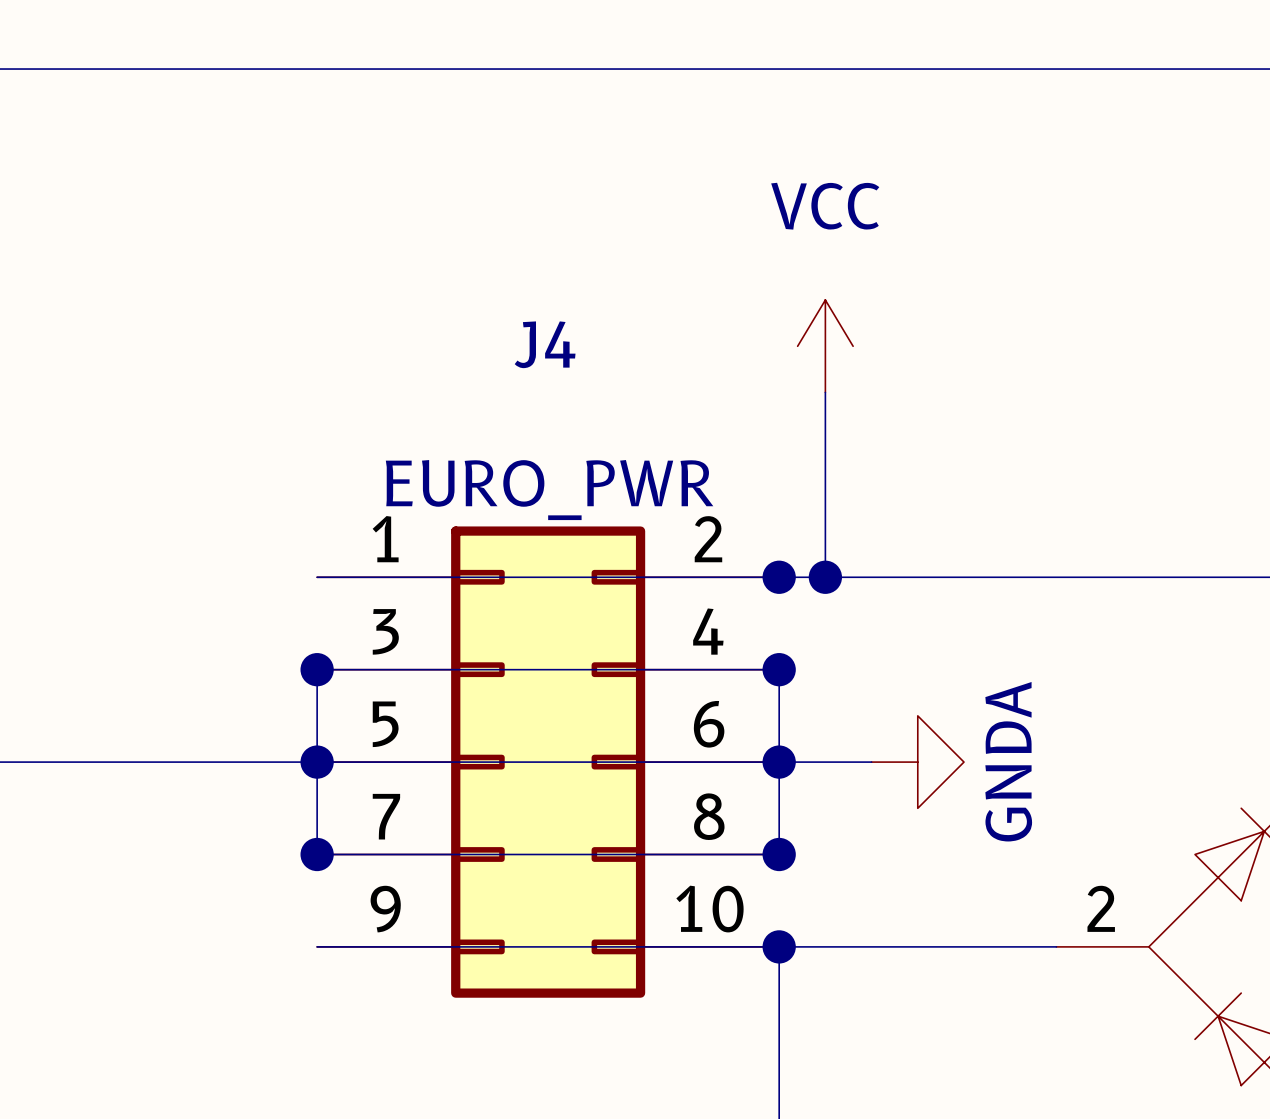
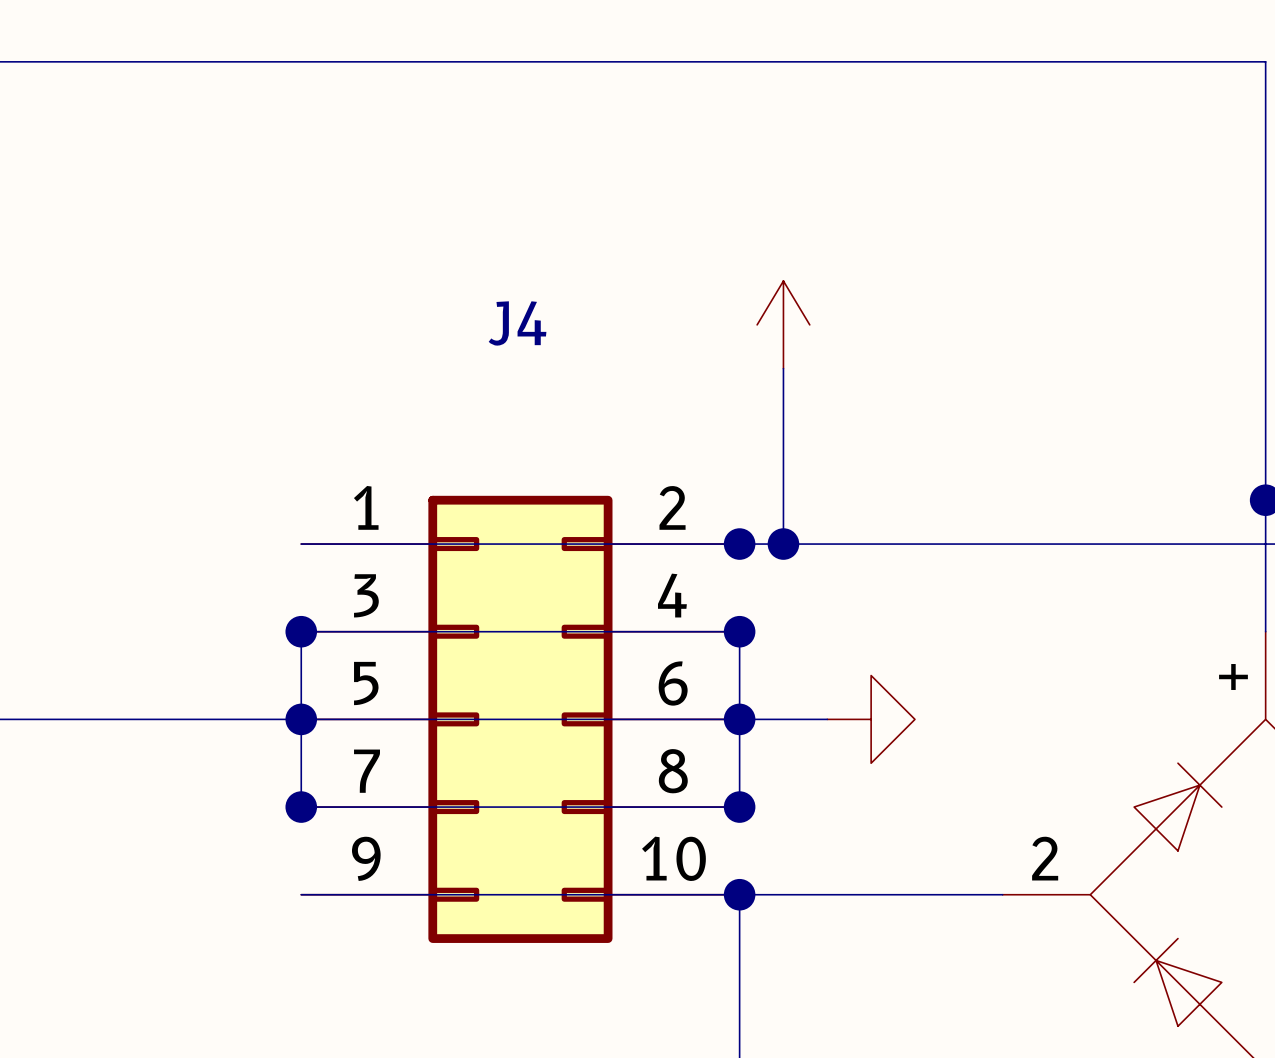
power symbol text: VCC (825, 206) -> none
J4 value: EURO_PWR (549, 490) -> none
power symbol text: GNDA (1008, 761) -> none

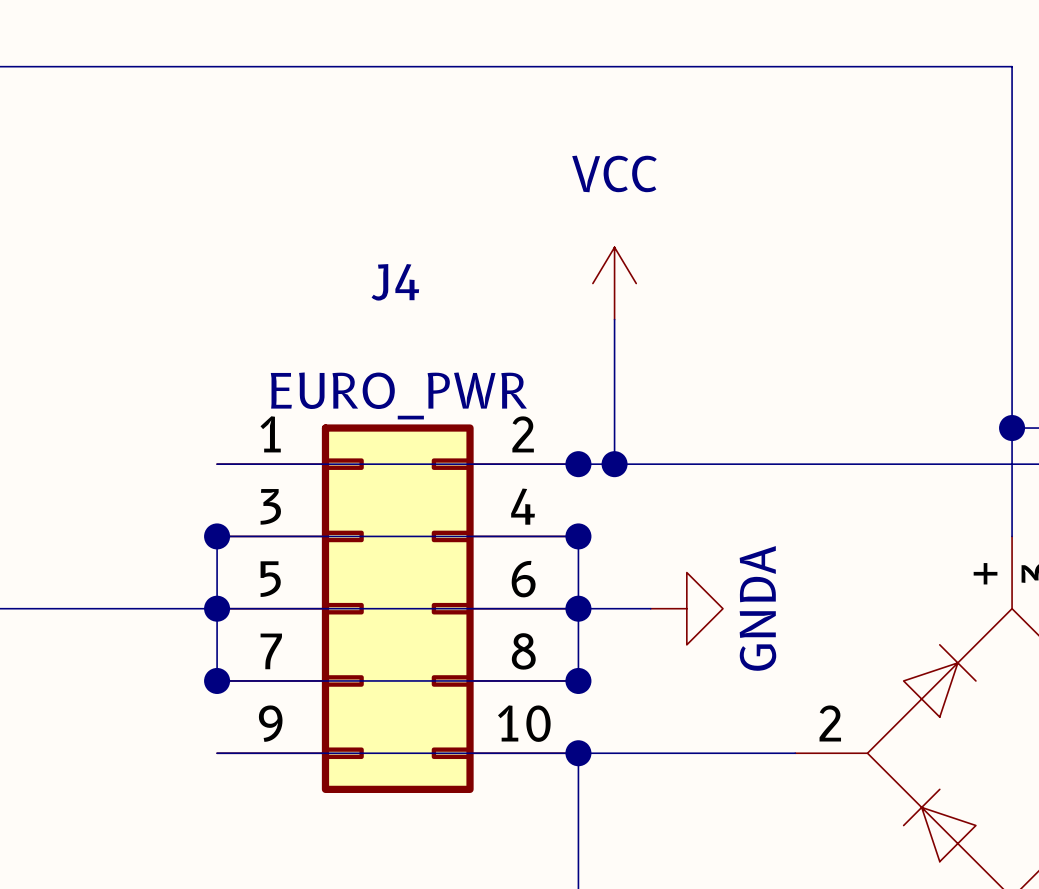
power symbol text: none -> VCC (614, 173)
J4 value: none -> EURO_PWR (398, 395)
power symbol text: none -> GNDA (757, 608)

